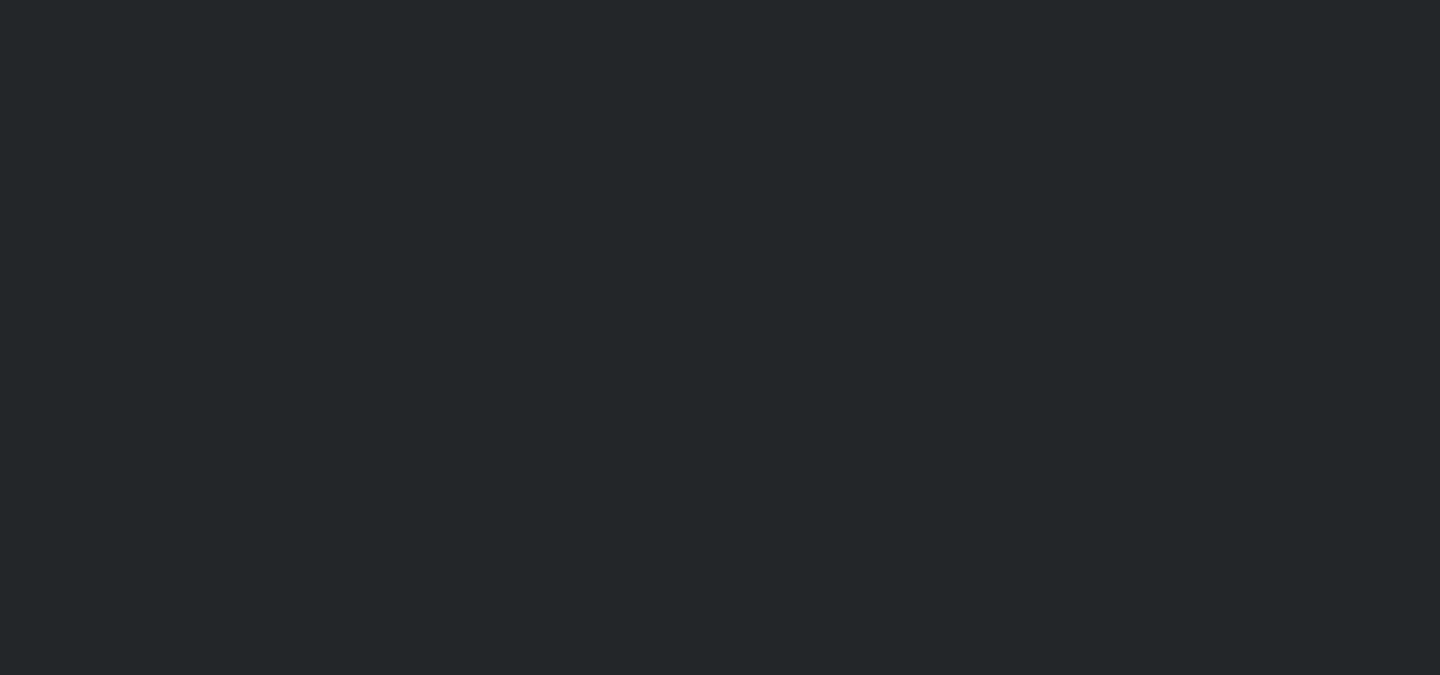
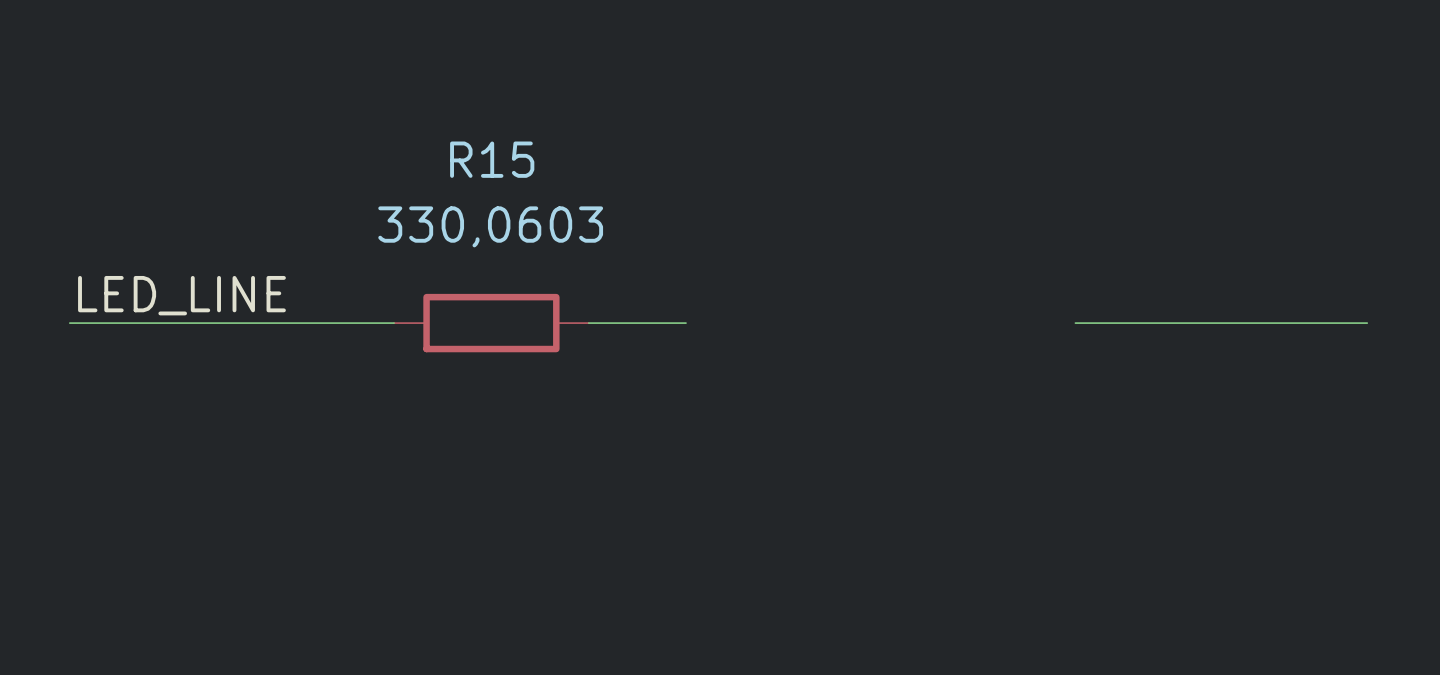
label: none -> LED_LINE (181, 295)
wire: none -> (69, 323) (394, 323)
R15: none -> 330,0603 (491, 323)
wire: none -> (588, 323) (686, 323)
wire: none -> (1075, 323) (1367, 323)

